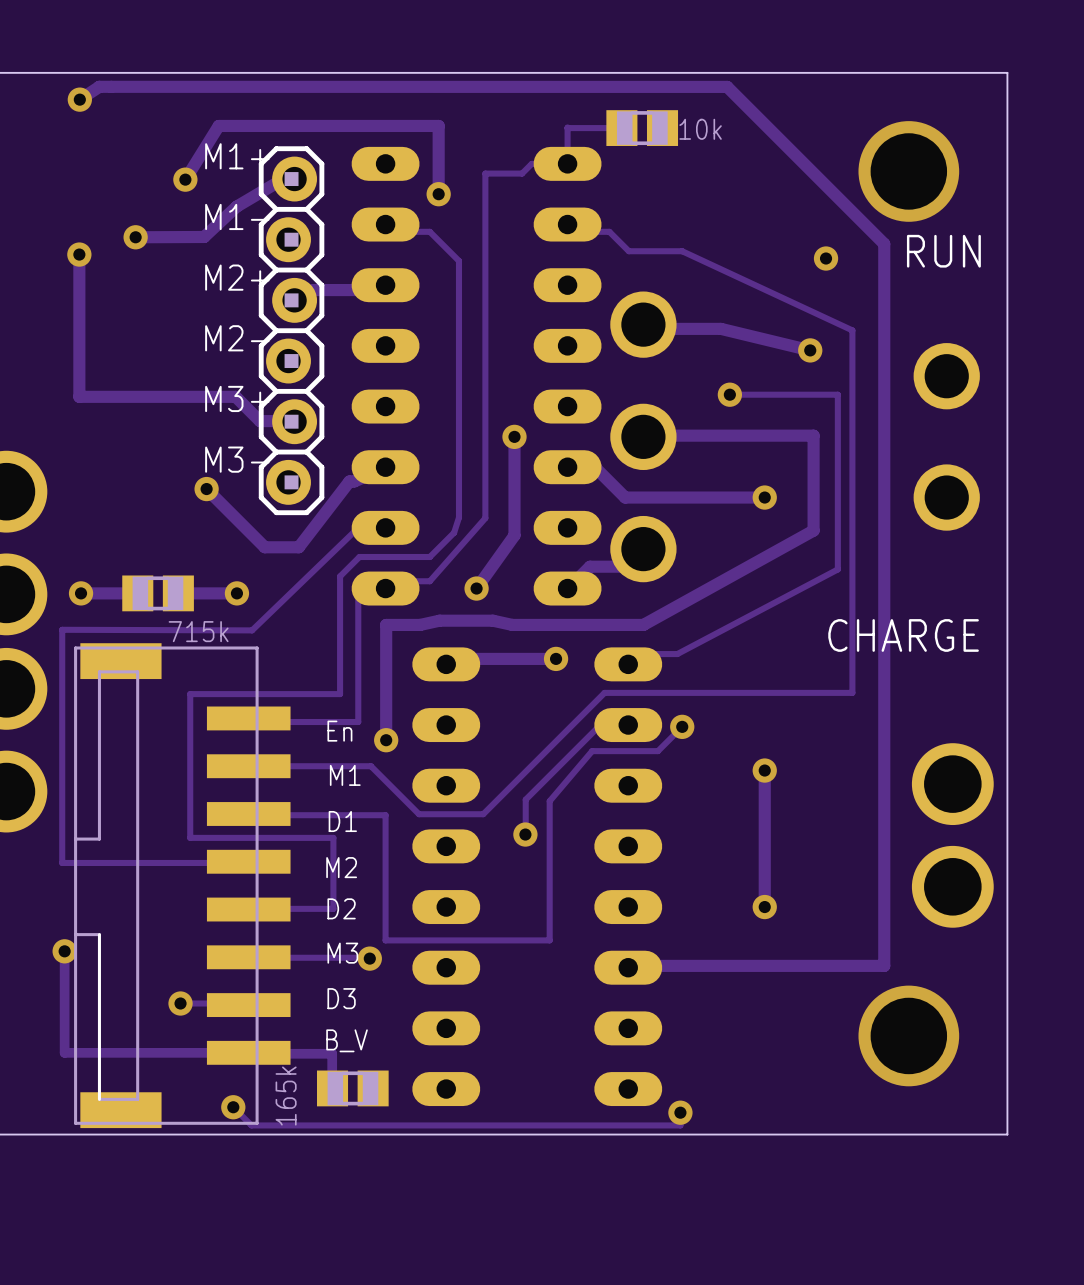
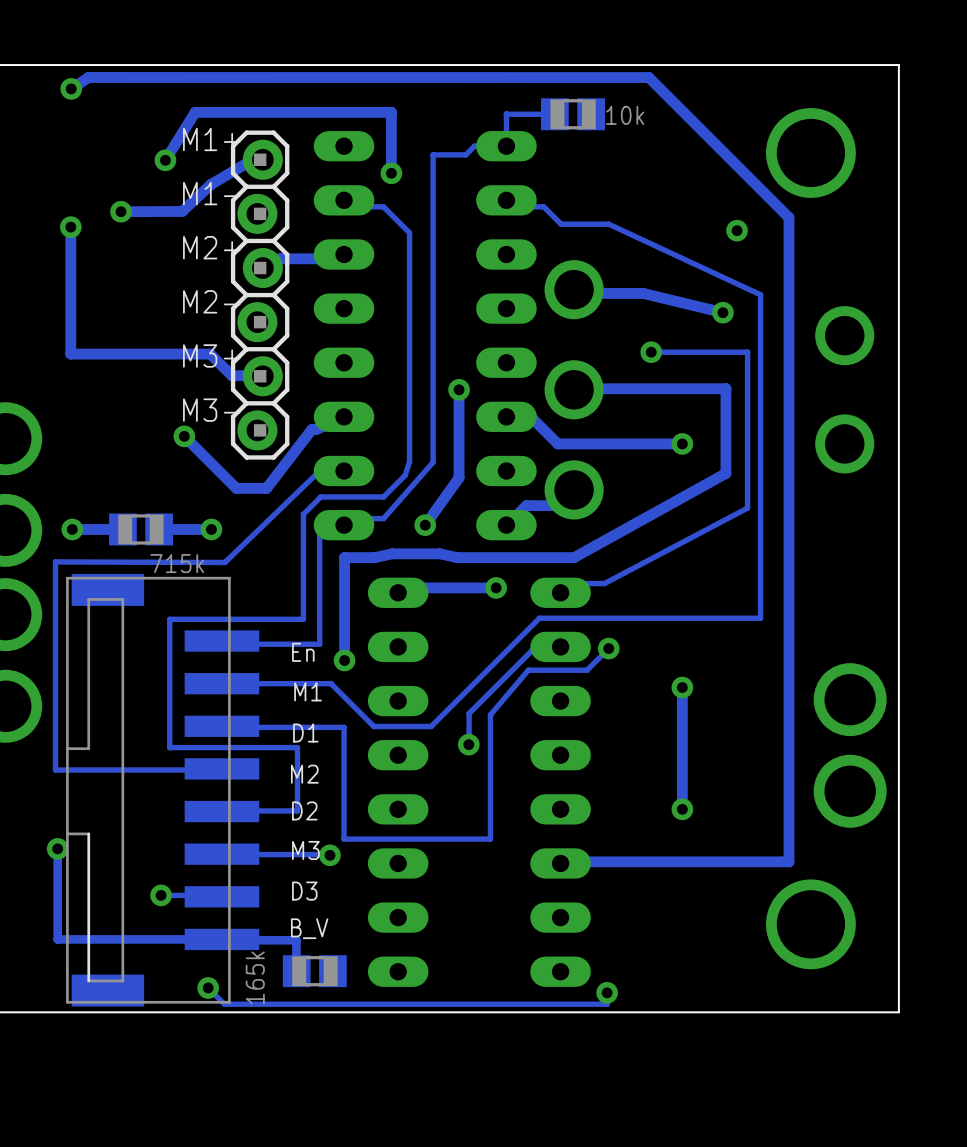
text: RUN (943, 251) -> none
text: CHARGE (903, 635) -> none

